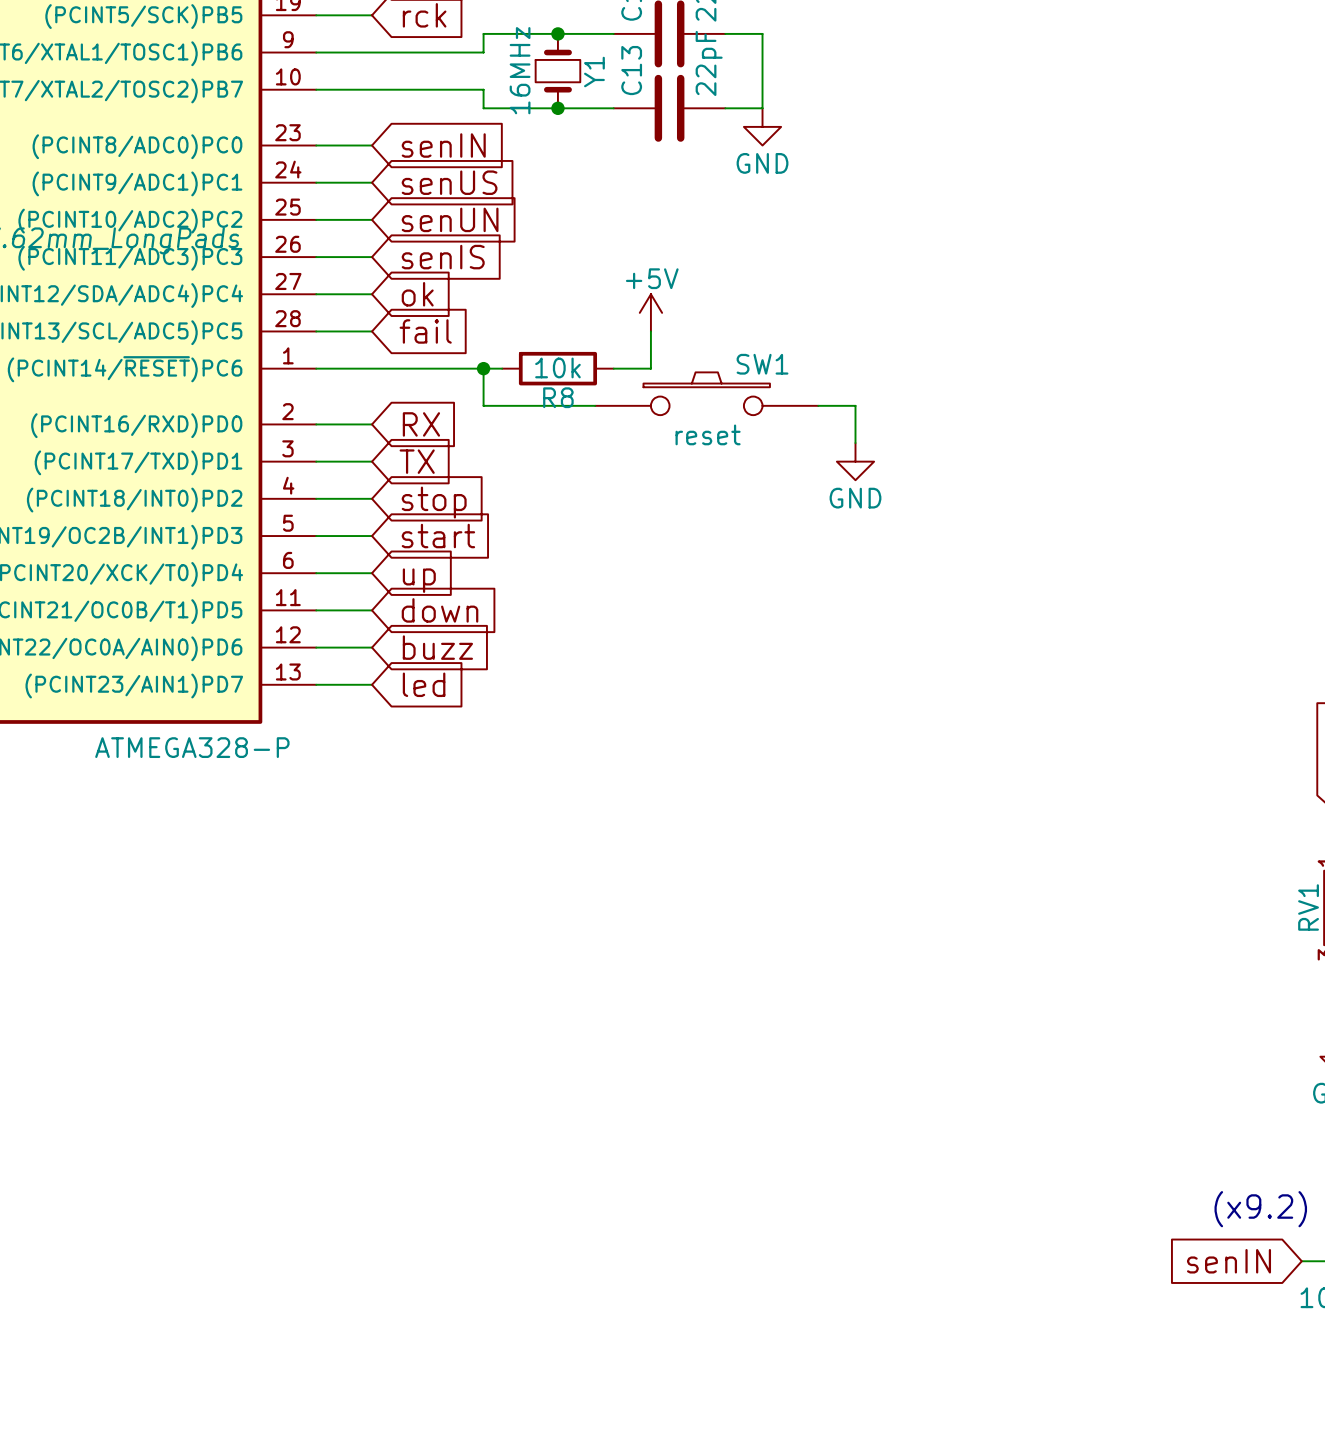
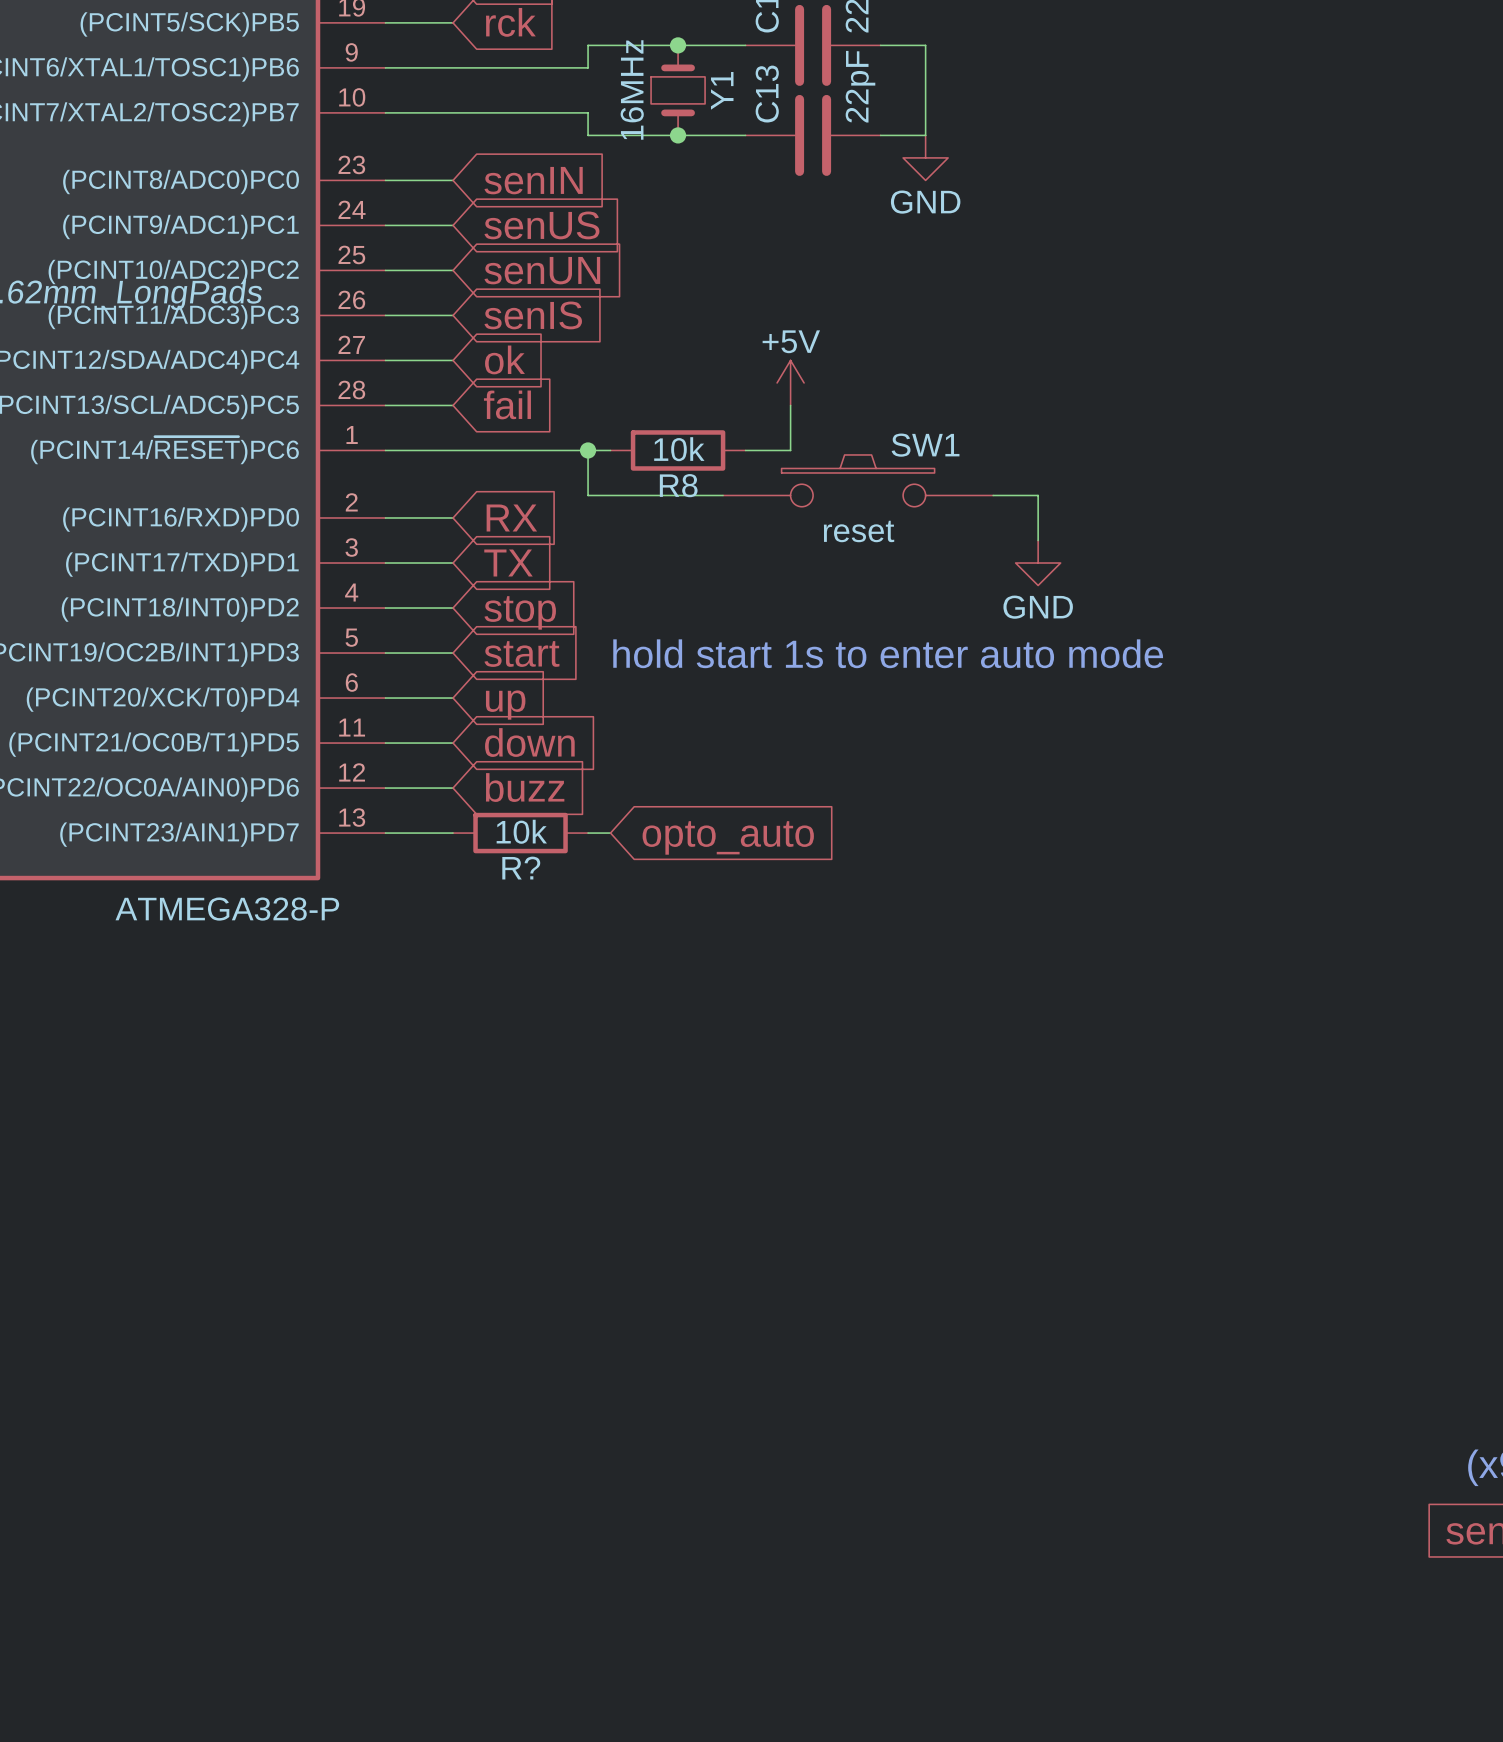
text: none -> hold start 1s to enter auto mode (888, 653)
global label: led (424, 684) -> none
R?: none -> 10k (520, 833)
wire: none -> (588, 833) (610, 833)
global label: none -> opto_auto (728, 837)

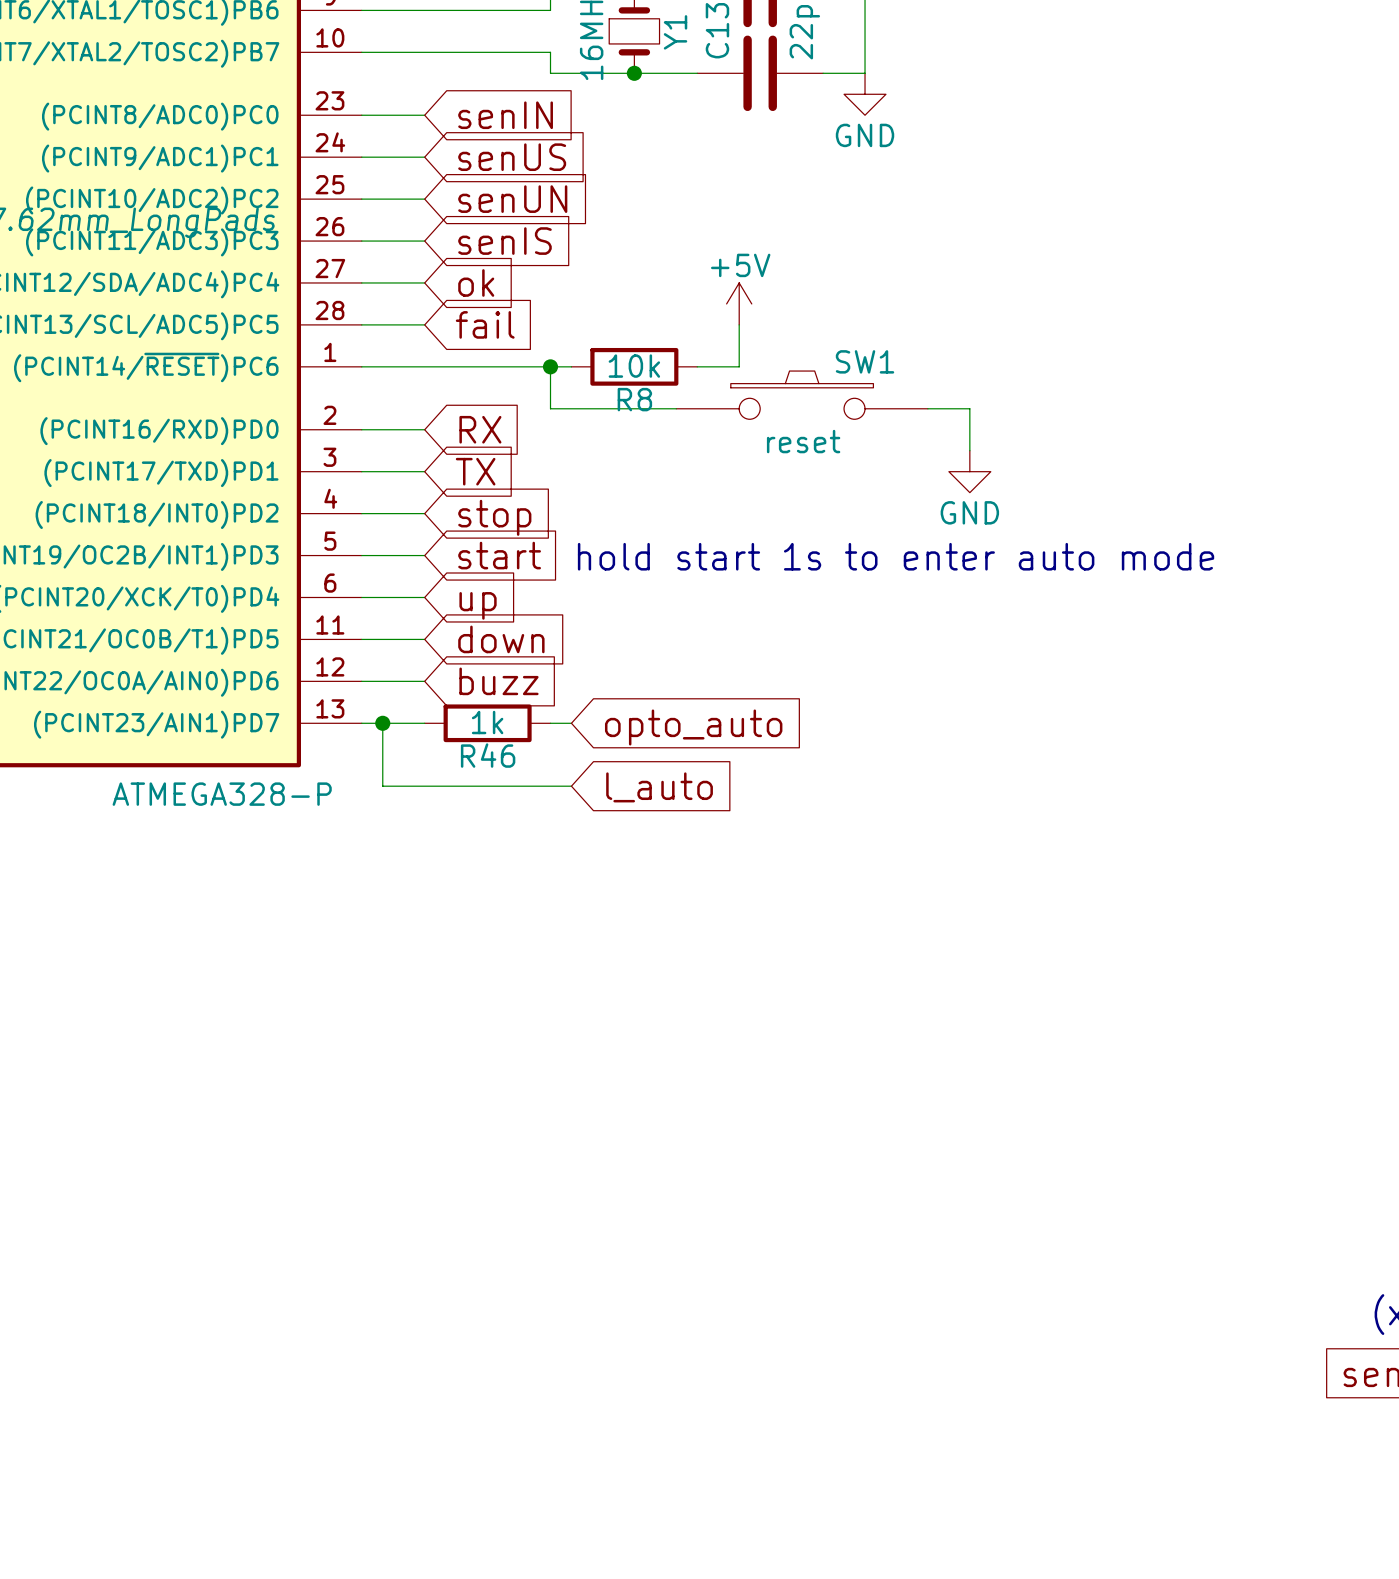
R? value: 10k (521, 831) -> 1k (487, 722)
wire: none -> (382, 723) (382, 786) (571, 786)
junction: none -> (382, 723)
R? name: R? (521, 868) -> R46 (488, 755)
global label: none -> l_auto (659, 787)

